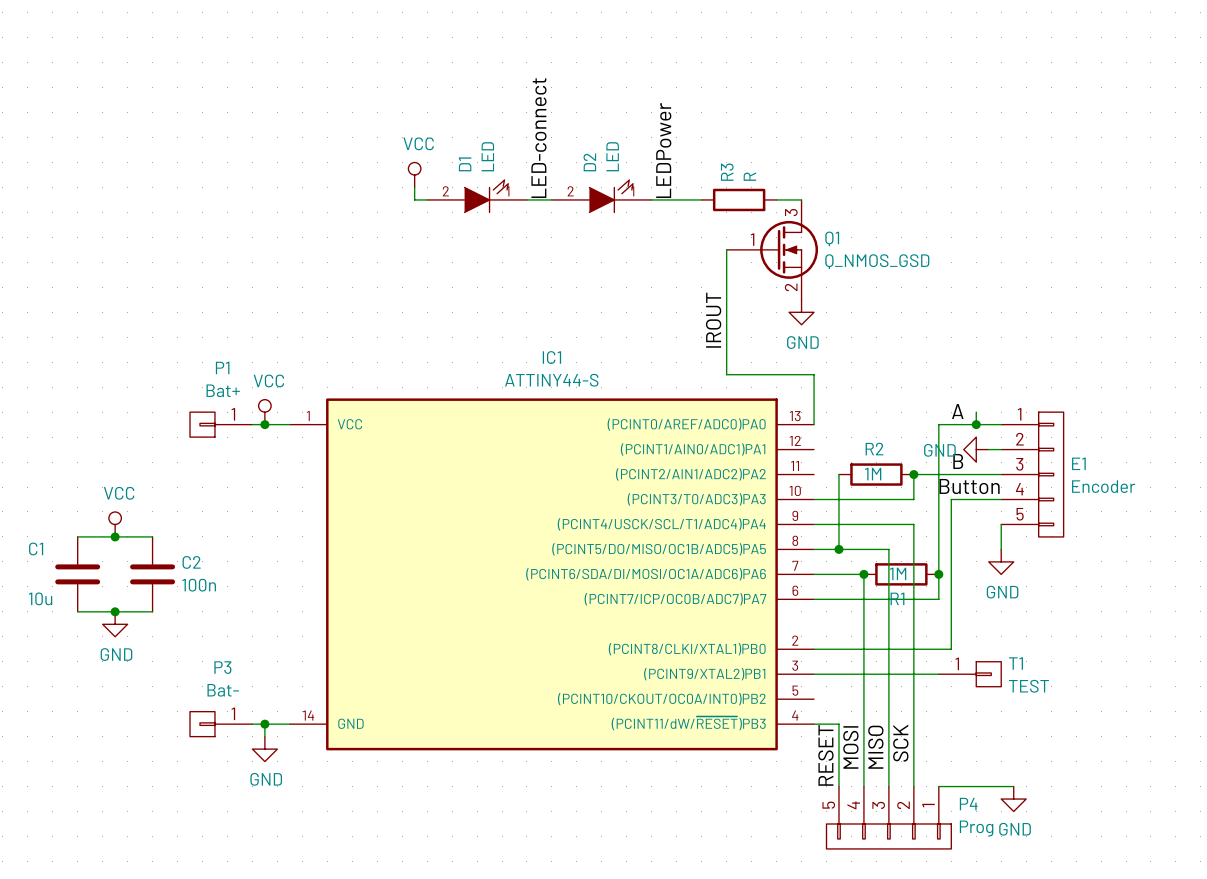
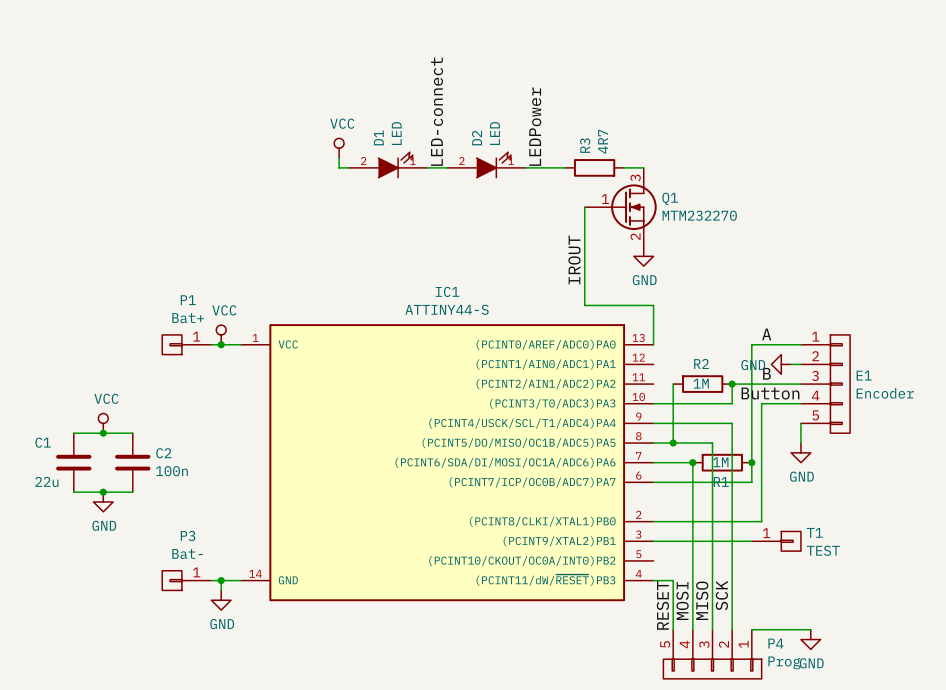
R3 value: R (749, 176) -> 4R7 (603, 141)
Q1 value: Q_NMOS_GSD (877, 261) -> MTM232270 (699, 215)
wire: (976, 412) (976, 424) -> none
junction: (976, 424) -> none
C1 value: 10u (40, 598) -> 22u (46, 481)

